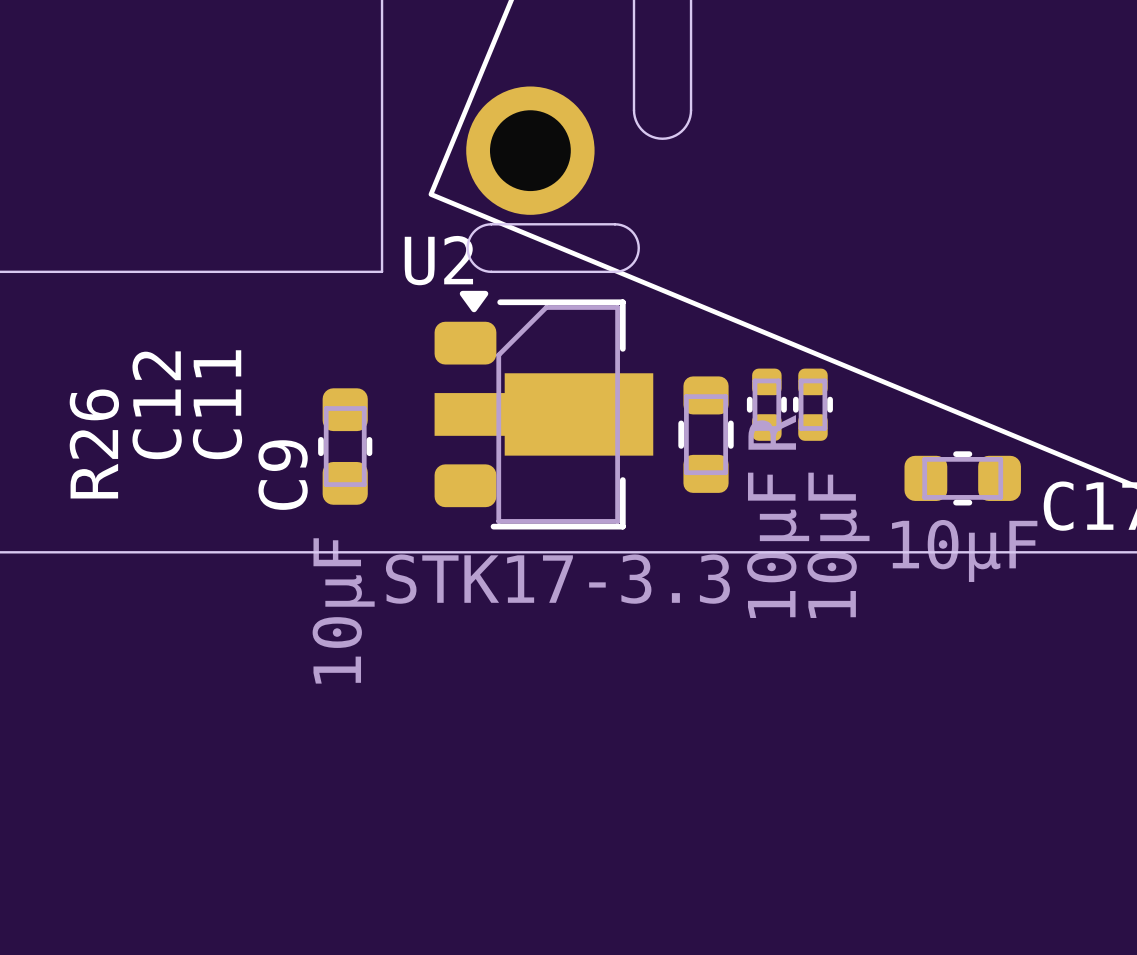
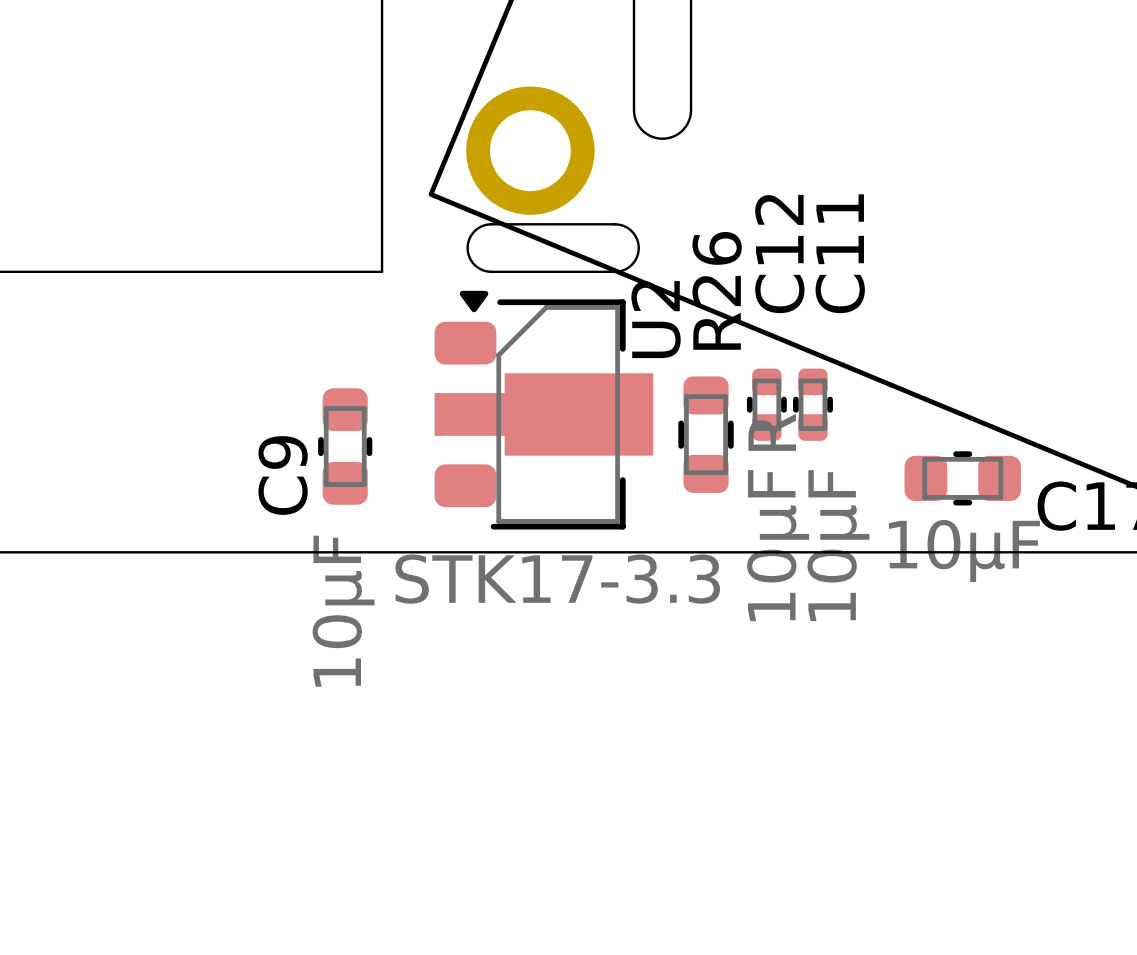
U2 name rotation: 0° (438, 260) -> 90° counterclockwise (656, 319)
U2 name position: U2 (438, 260) -> U2 (656, 319)
C11 name position: C11 (217, 404) -> C11 (840, 253)
C12 name position: C12 (157, 405) -> C12 (779, 254)
R26 name position: R26 (94, 444) -> R26 (717, 290)

